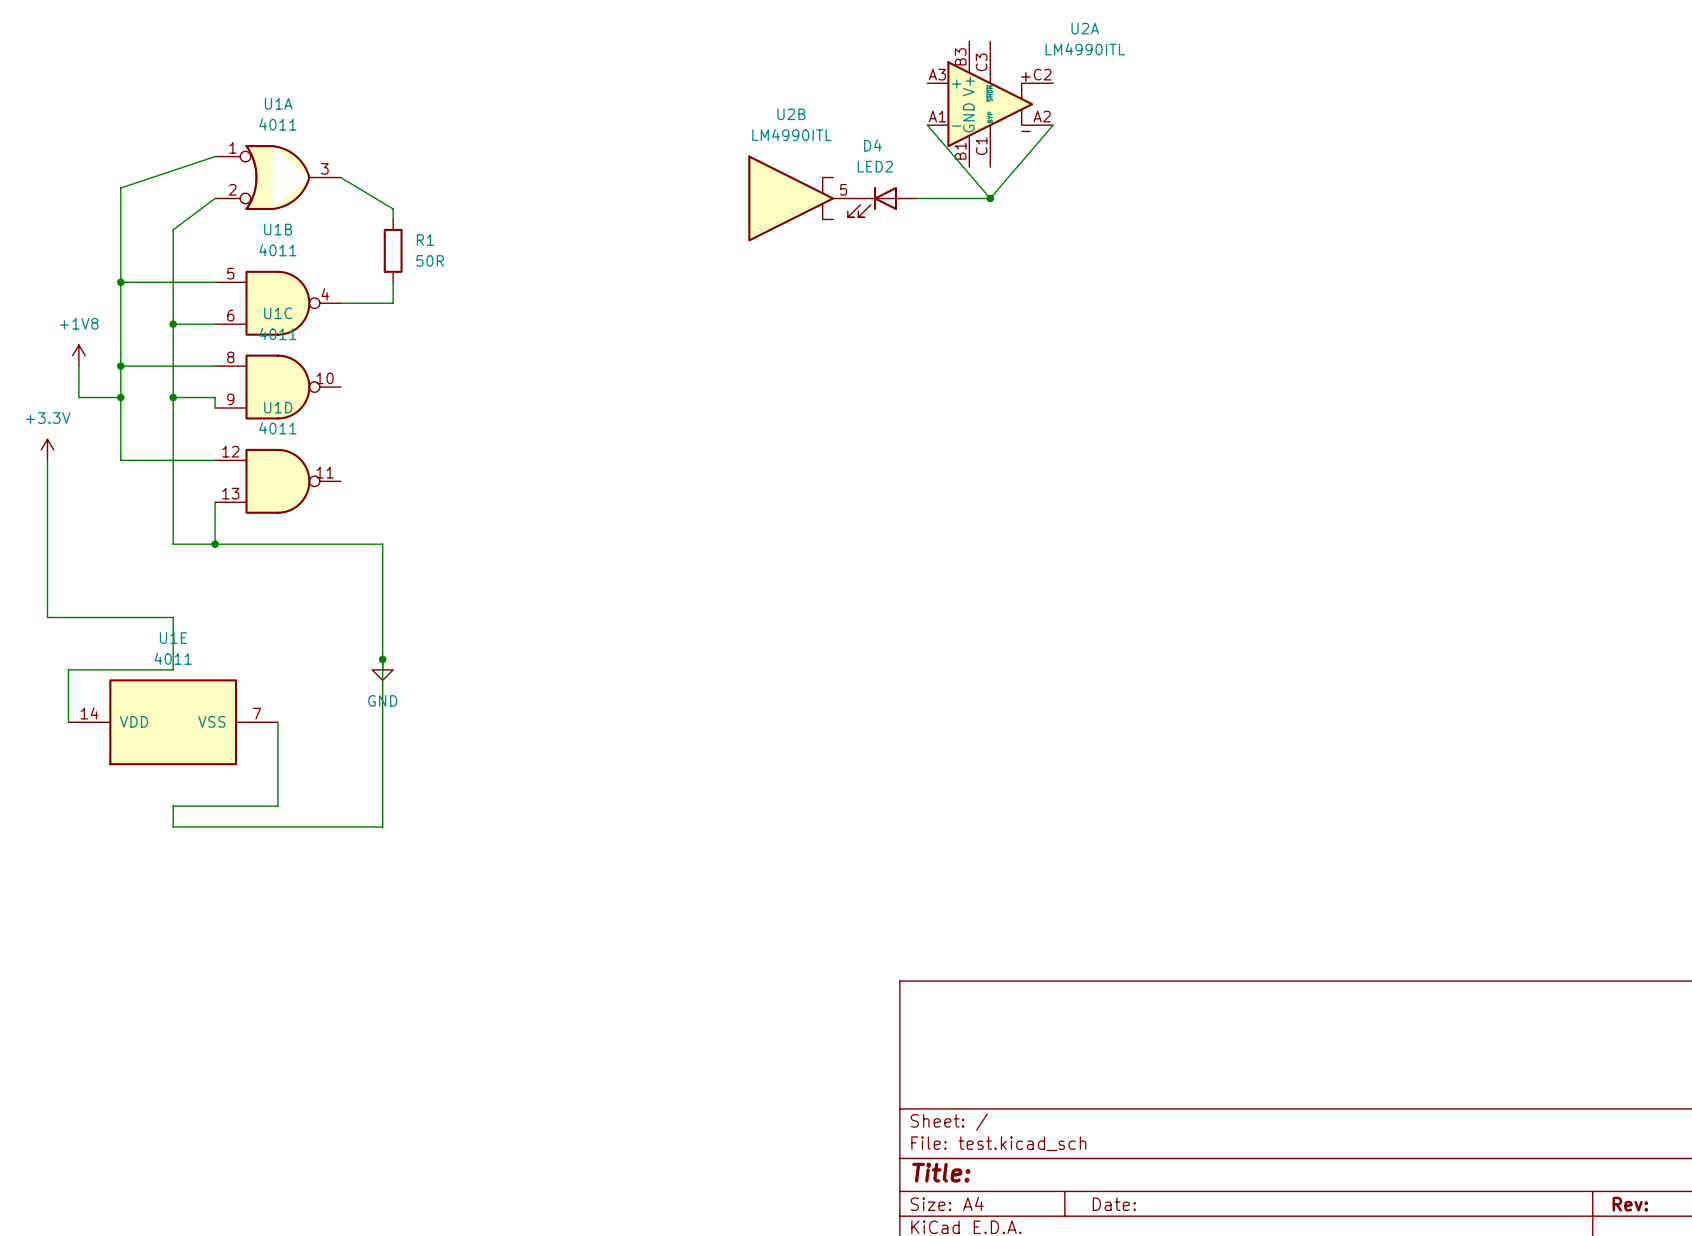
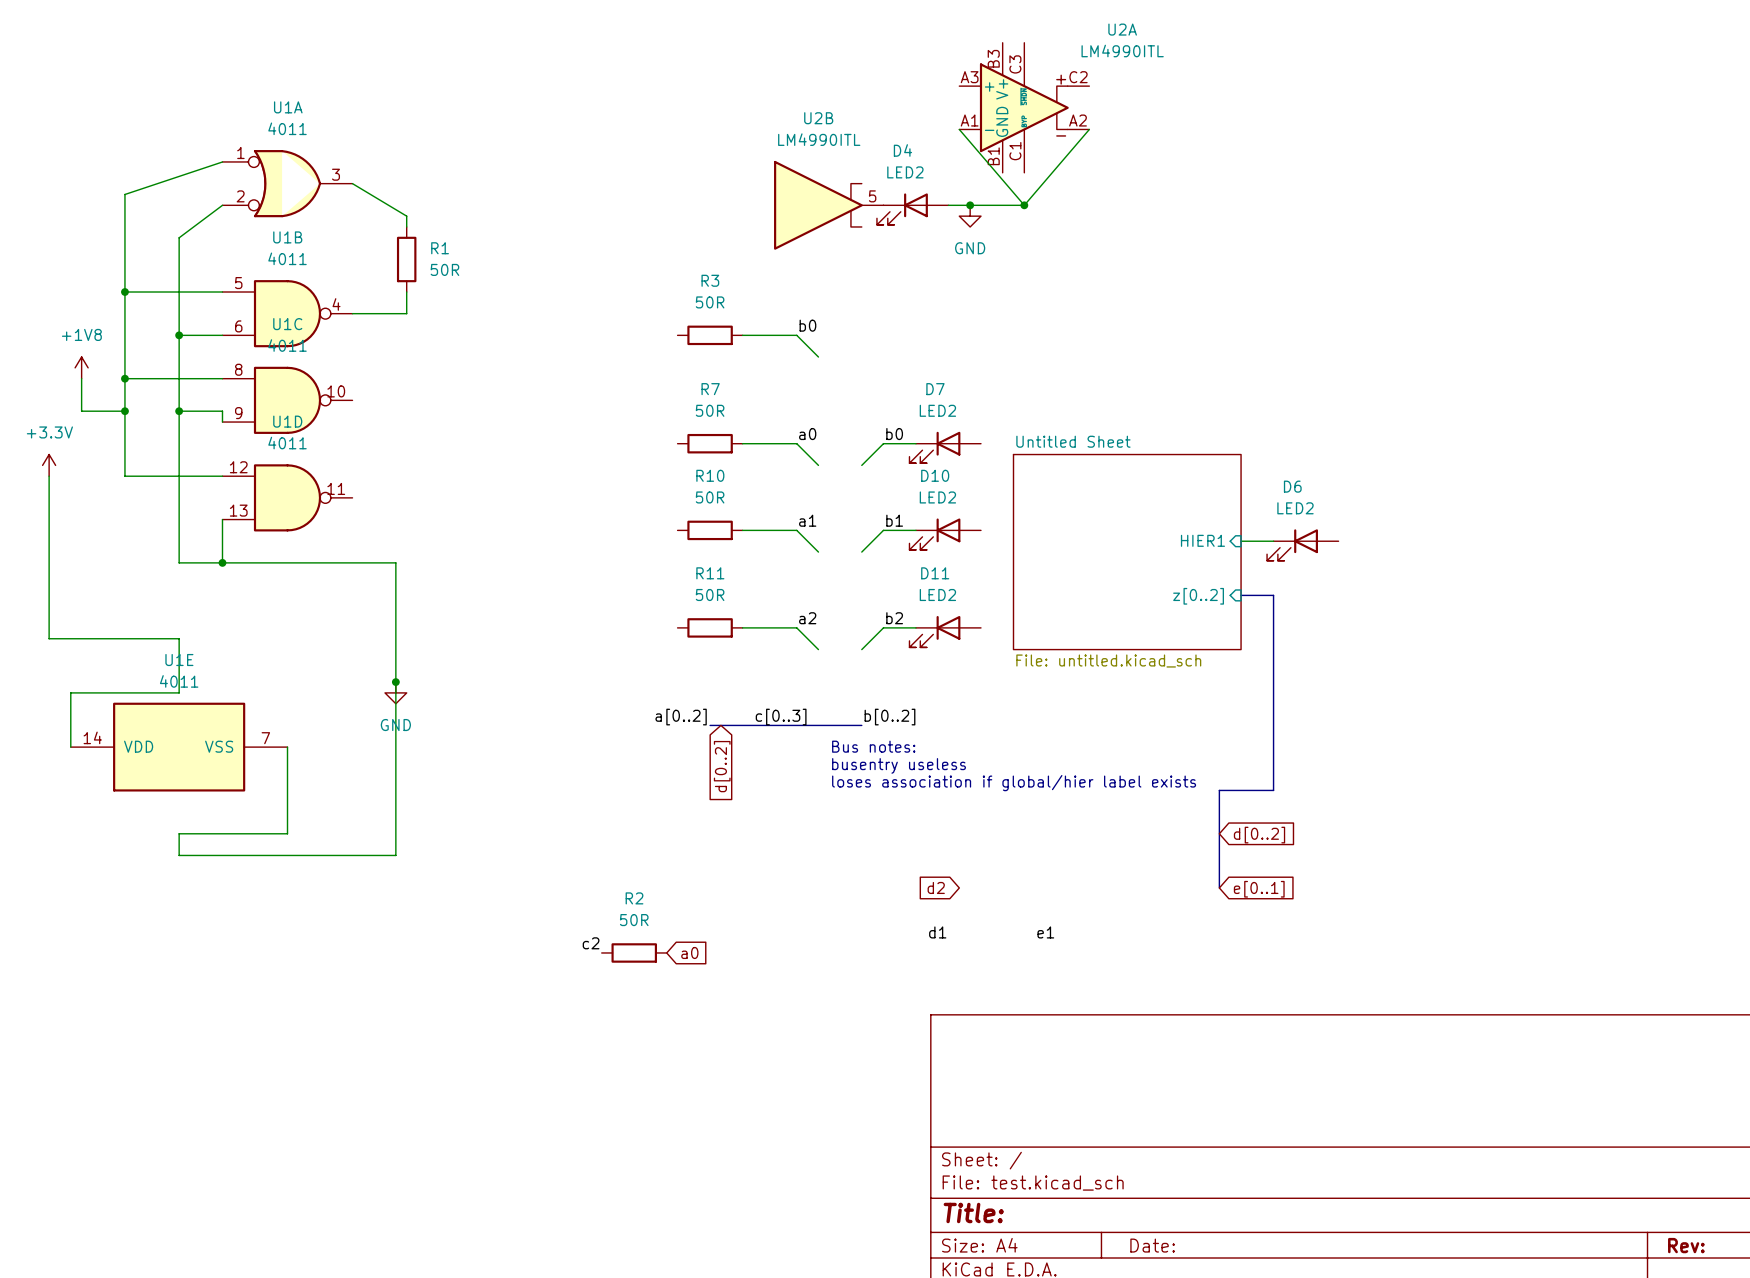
junction: none -> (970, 205)
power symbol: none -> GND (970, 216)
label: none -> b0 (807, 325)
R3: none -> 50R (710, 335)
wire: none -> (742, 335) (796, 335) (818, 357)
label: none -> a0 (807, 434)
label: none -> b0 (894, 434)
R7: none -> 50R (710, 443)
wire: none -> (742, 443) (796, 443) (818, 465)
wire: none -> (915, 443) (883, 443) (861, 465)
D7: none -> LED2 (945, 447)
label: none -> a1 (807, 520)
label: none -> b1 (894, 520)
R10: none -> 50R (710, 530)
wire: none -> (742, 530) (796, 530) (818, 552)
wire: none -> (915, 530) (883, 530) (861, 552)
D10: none -> LED2 (945, 534)
sheet pin: none -> HIER1 (1202, 540)
wire: none -> (1241, 541) (1273, 541)
D6: none -> LED2 (1302, 545)
sheet Untitled Sheet: none -> File: untitled.kicad_sch (1127, 552)
bus: none -> (1241, 595) (1273, 595) (1273, 790) (1219, 790) (1219, 887)
sheet pin: none -> z[0..2] (1198, 596)
label: none -> a2 (807, 618)
label: none -> b2 (894, 618)
R11: none -> 50R (710, 627)
wire: none -> (742, 627) (796, 627) (818, 649)
wire: none -> (915, 627) (883, 627) (861, 649)
D11: none -> LED2 (945, 631)
label: none -> a[0..2] (681, 717)
label: none -> c[0..3] (781, 717)
label: none -> b[0..2] (890, 717)
bus: none -> (710, 725) (861, 725)
text: none -> Bus notes: (873, 746)
text: none -> busentry useless (899, 765)
global label: none -> d[0..2] (722, 766)
text: none -> loses association if global/hier label exists (1014, 783)
global label: none -> d[0..2] (1259, 835)
global label: none -> d2 (936, 887)
global label: none -> e[0..1] (1259, 889)
label: none -> d1 (937, 932)
label: none -> e1 (1045, 932)
label: none -> c2 (591, 943)
R2: none -> 50R (634, 952)
global label: none -> a0 (689, 952)

